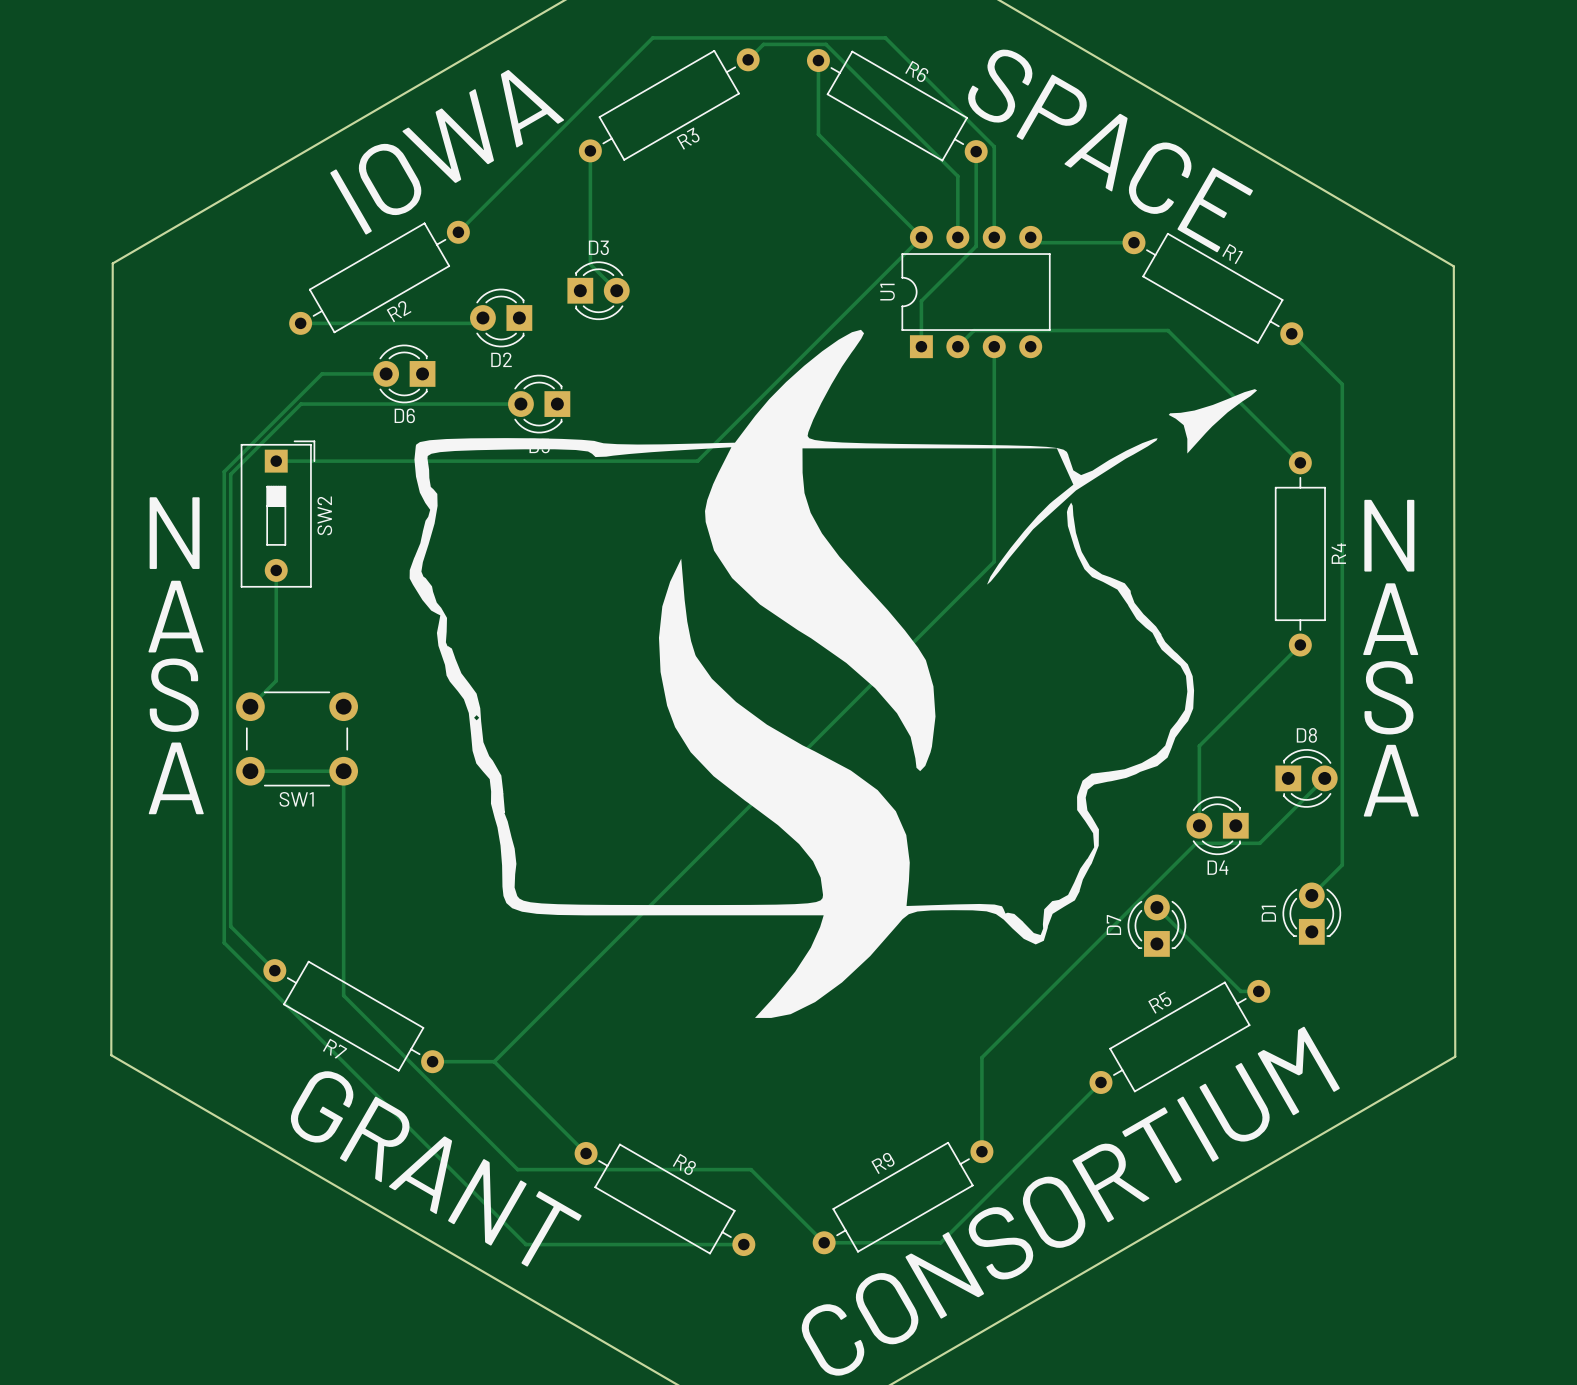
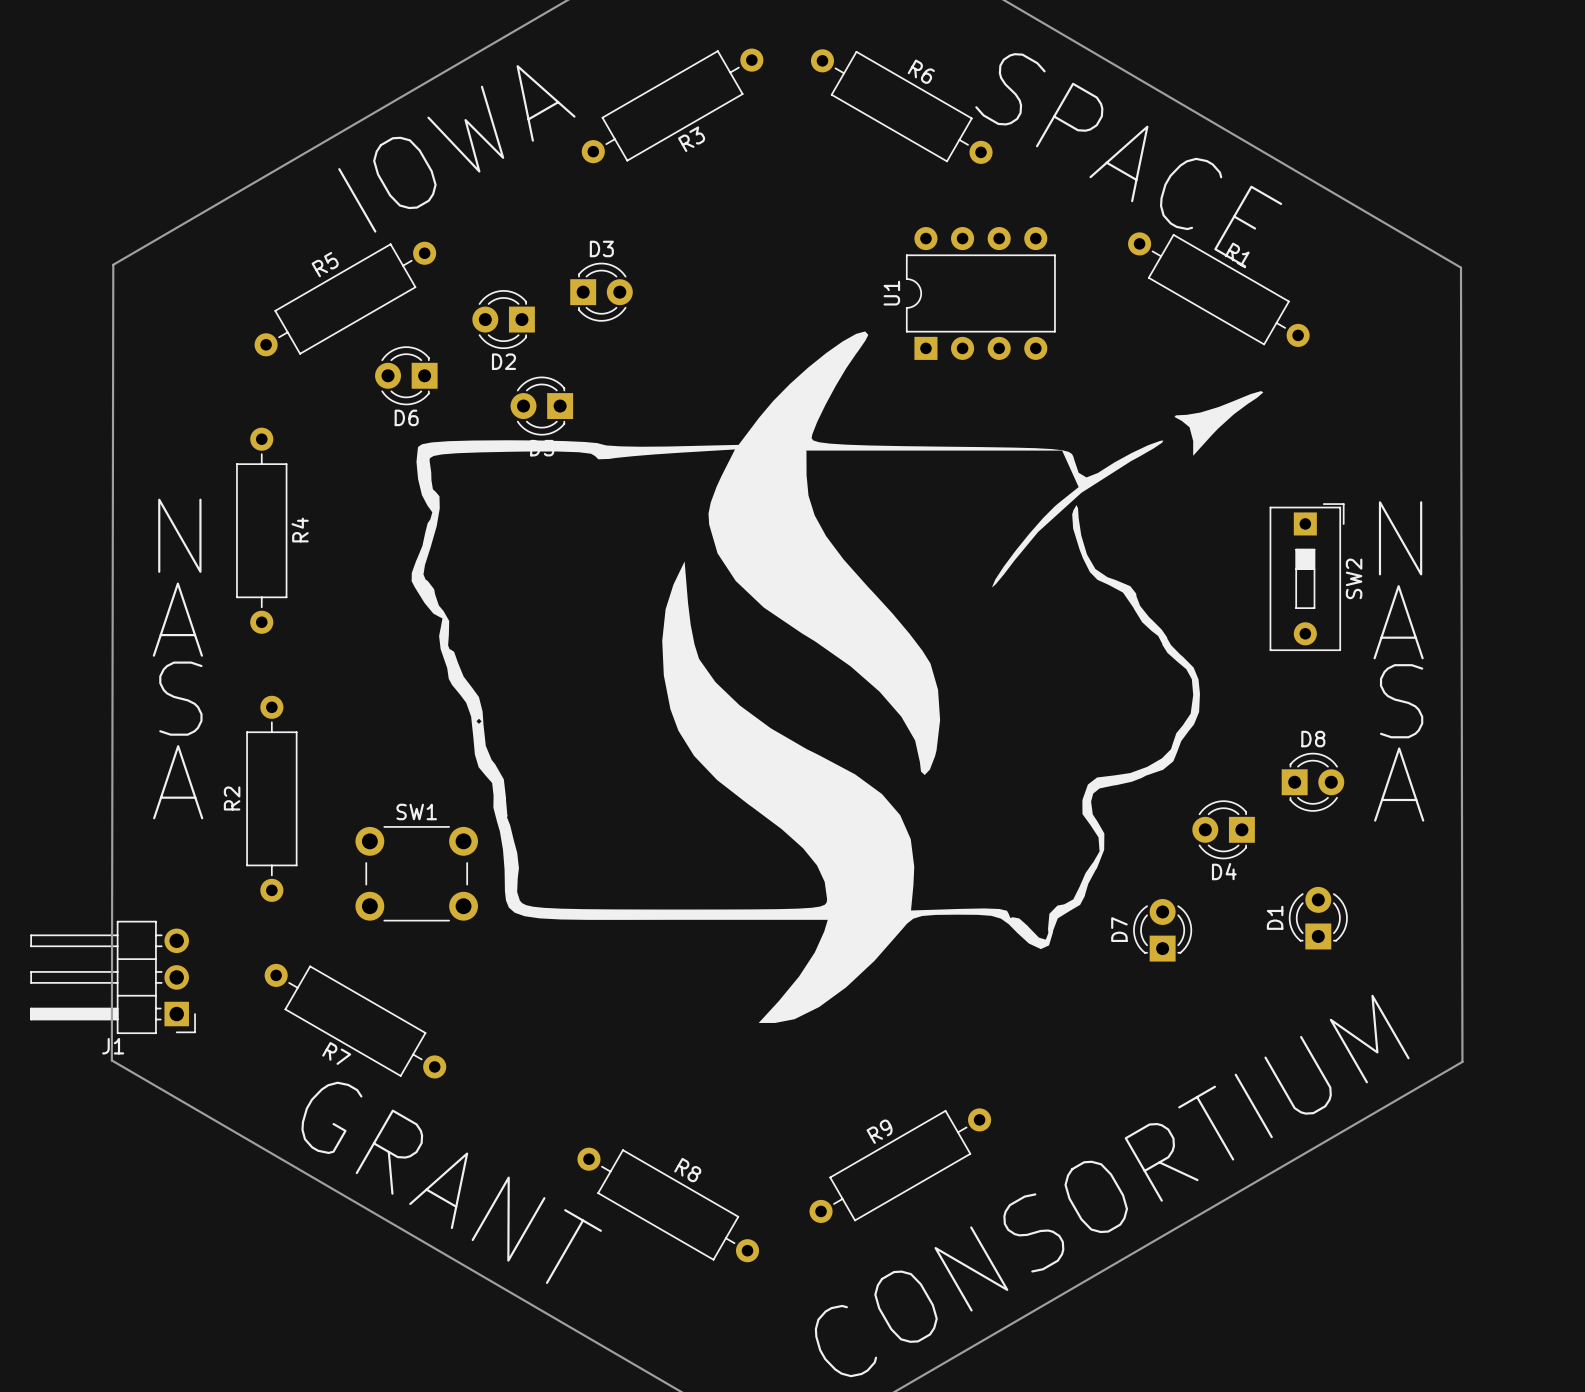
track: (748, 59) (763, 44) (825, 44) (957, 176) (957, 237) -> none
track: (818, 60) (818, 134) (921, 237) (697, 461) (276, 461) -> none
track: (590, 150) (590, 264) (616, 290) -> none
track: (976, 151) (976, 246) (921, 301) (921, 346) -> none
track: (458, 232) (652, 37) (885, 37) (994, 146) (994, 237) -> none
track: (1030, 237) (1036, 242) (1133, 242) -> none
R2 rotation: 0° (379, 277) -> 60° counterclockwise (271, 798)
R2 position: (379, 277) -> (271, 798)
R2 name position: R2 (399, 311) -> R2 (232, 798)
track: (482, 317) (477, 323) (300, 323) -> none
track: (1291, 333) (1342, 384) (1342, 864) (1311, 895) -> none
track: (957, 346) (973, 330) (1168, 330) (1300, 462) -> none
track: (994, 346) (994, 561) (494, 1061) -> none
track: (386, 373) (322, 373) (224, 471) (224, 942) (525, 1244) (743, 1244) -> none
track: (520, 404) (301, 404) (230, 474) (230, 926) (274, 970) -> none
SW2 position: (277, 514) -> (1307, 577)
R4 position: (1300, 553) -> (261, 530)
track: (276, 570) (276, 680) (250, 706) -> none
track: (1300, 645) (1199, 745) (1199, 825) -> none
SW1 position: (297, 738) -> (416, 873)
track: (250, 771) (343, 771) (343, 995) (517, 1169) (751, 1169) (824, 1242) (940, 1242) (1100, 1082) -> none
track: (1324, 778) (1259, 843) (1196, 843) (981, 1057) (981, 1151) -> none
SW1 name position: SW1 (296, 799) -> SW1 (416, 811)
track: (1156, 907) (1240, 991) (1258, 991) -> none
J1: none -> (113, 977)
R5 position: (1179, 1036) -> (345, 299)
track: (432, 1061) (494, 1061) -> none
track: (494, 1061) (586, 1153) -> none
R9 position: (903, 1197) -> (900, 1165)

